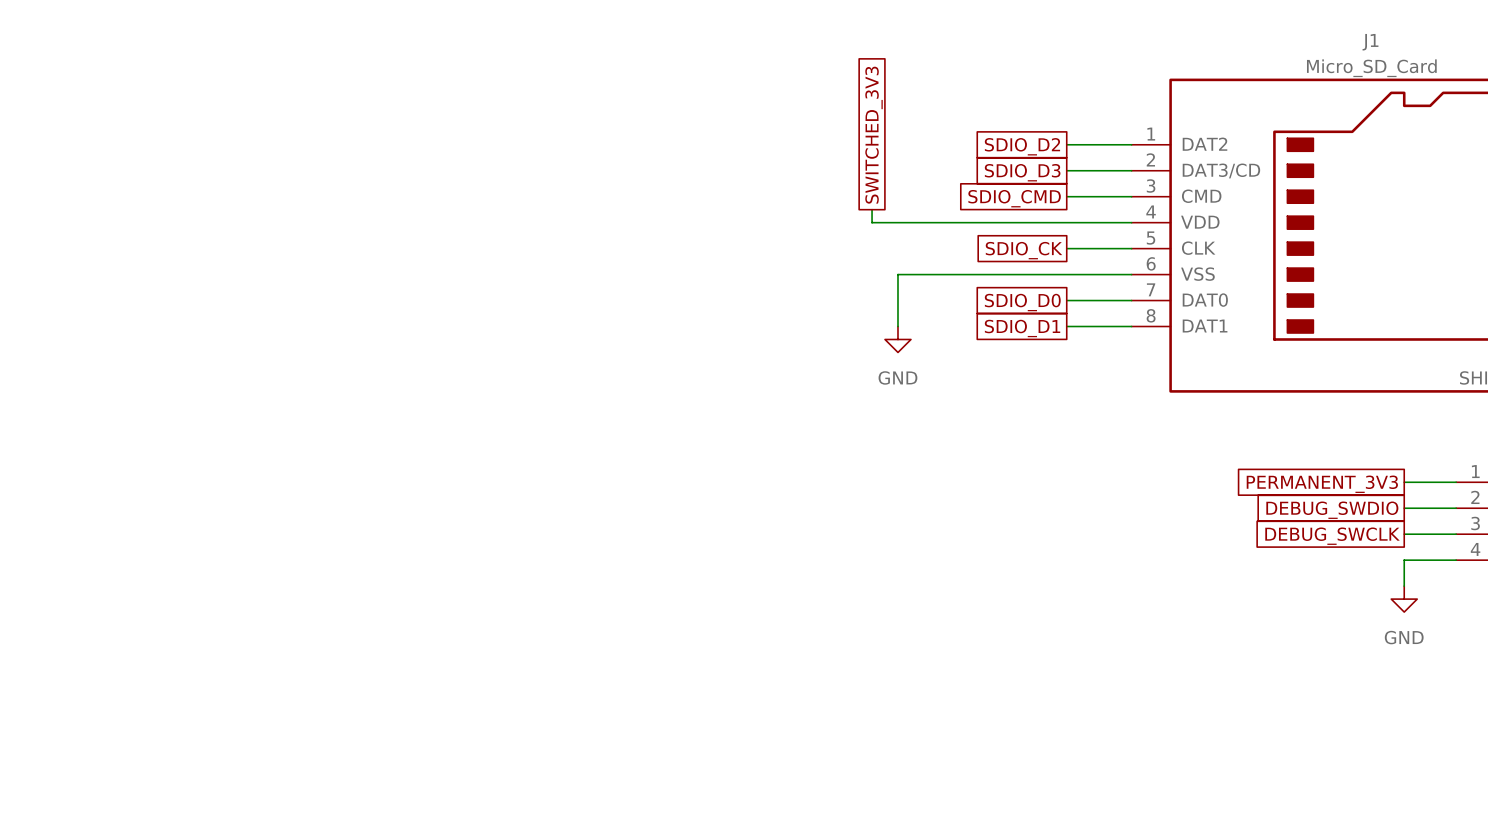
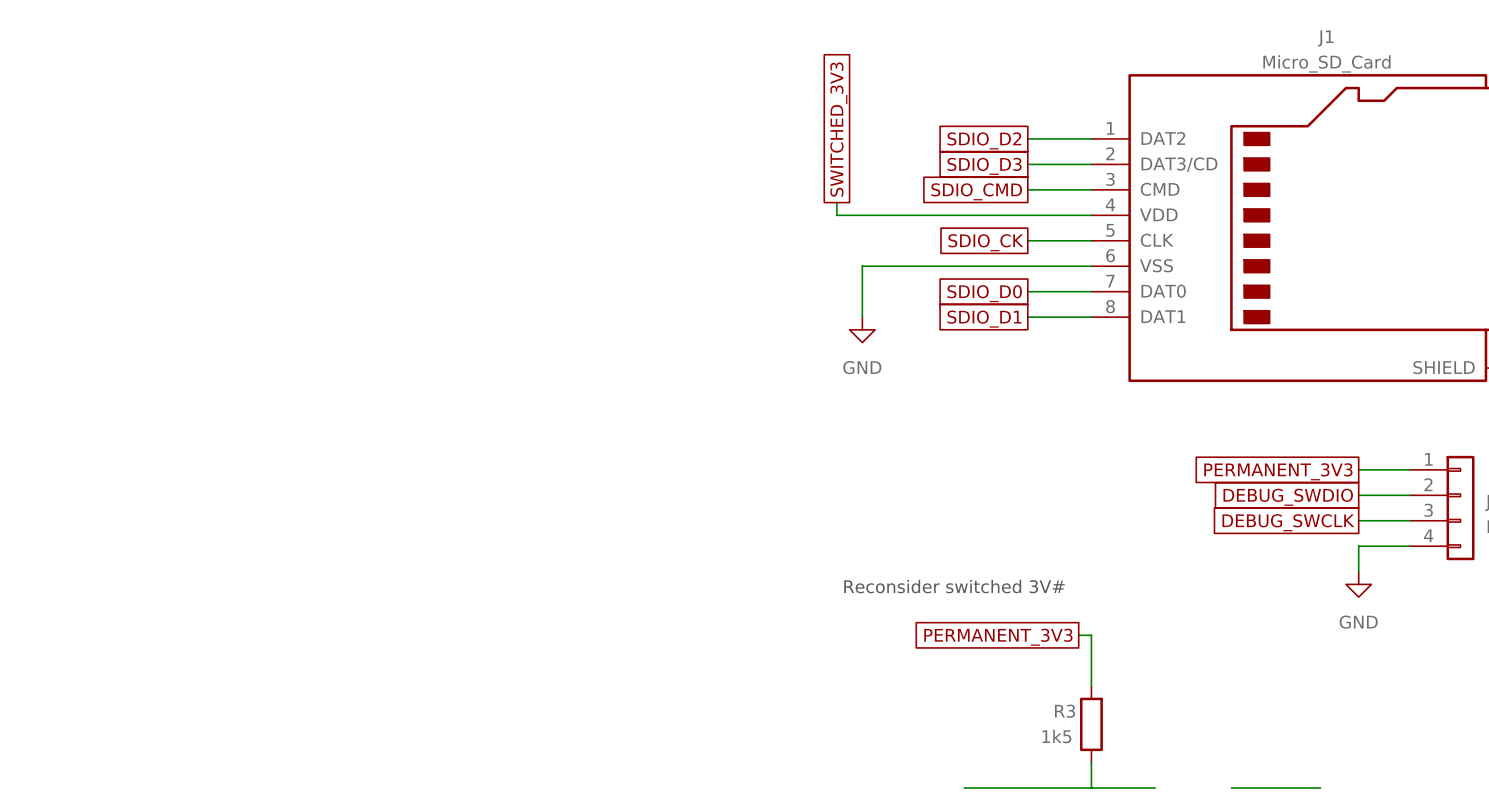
text: none -> Reconsider switched 3V# (954, 586)
wire: none -> (1078, 635) (1091, 635) (1091, 686)
global label: none -> PERMANENT_3V3 (998, 637)
R3: none -> 1k5 (1091, 724)
wire: none -> (1091, 762) (1091, 788)
wire: none -> (964, 788) (1155, 788)
wire: none -> (1231, 788) (1320, 788)

